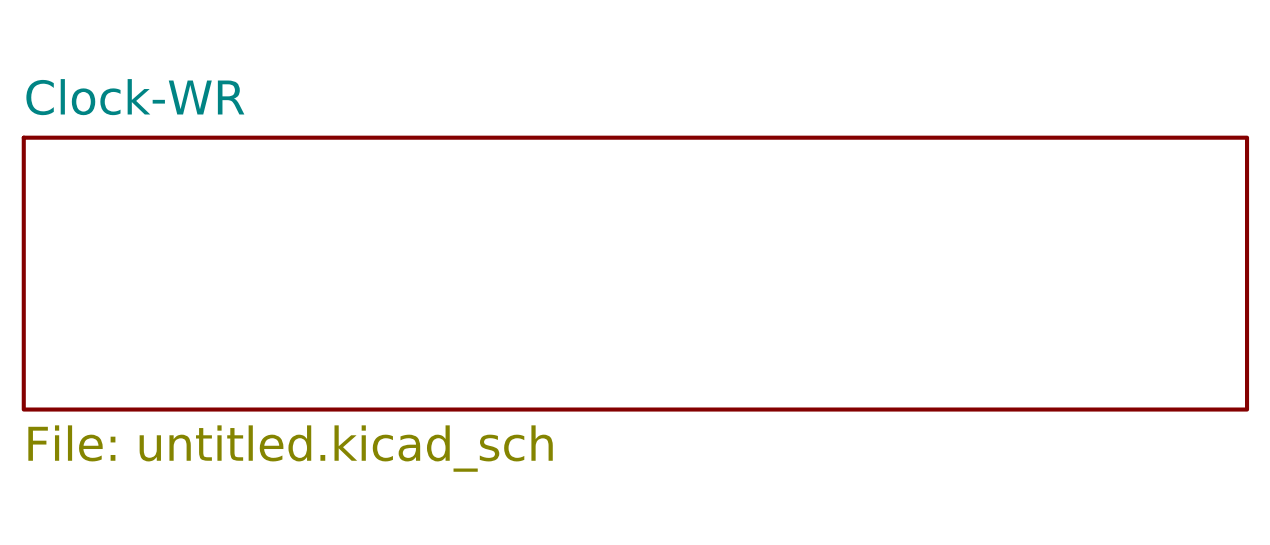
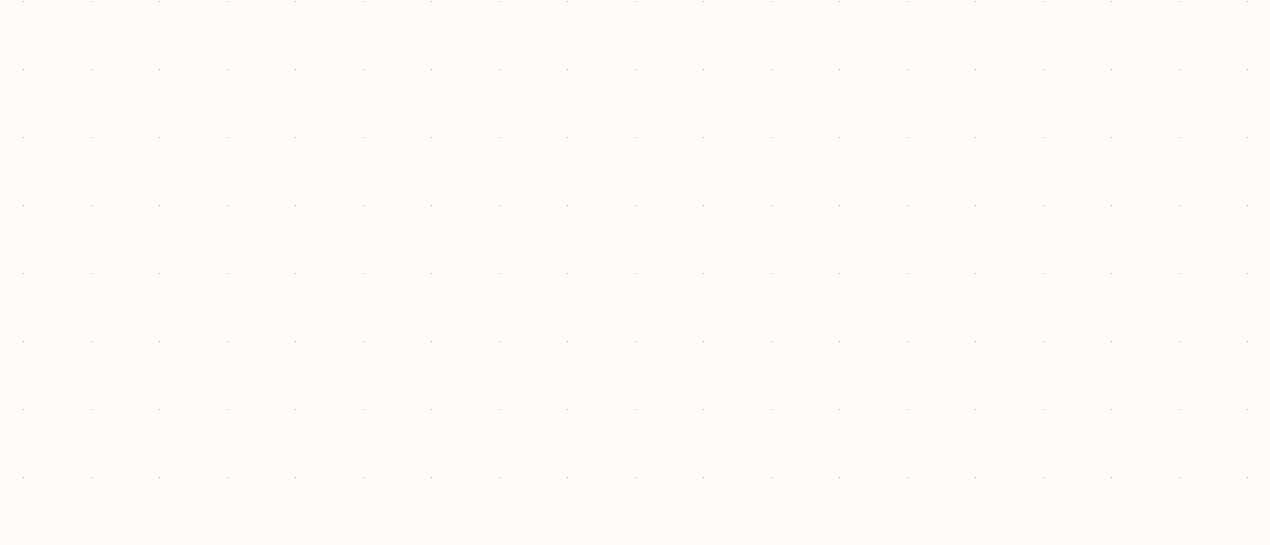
sheet Clock-WR: File: untitled.kicad_sch (635, 273) -> none

